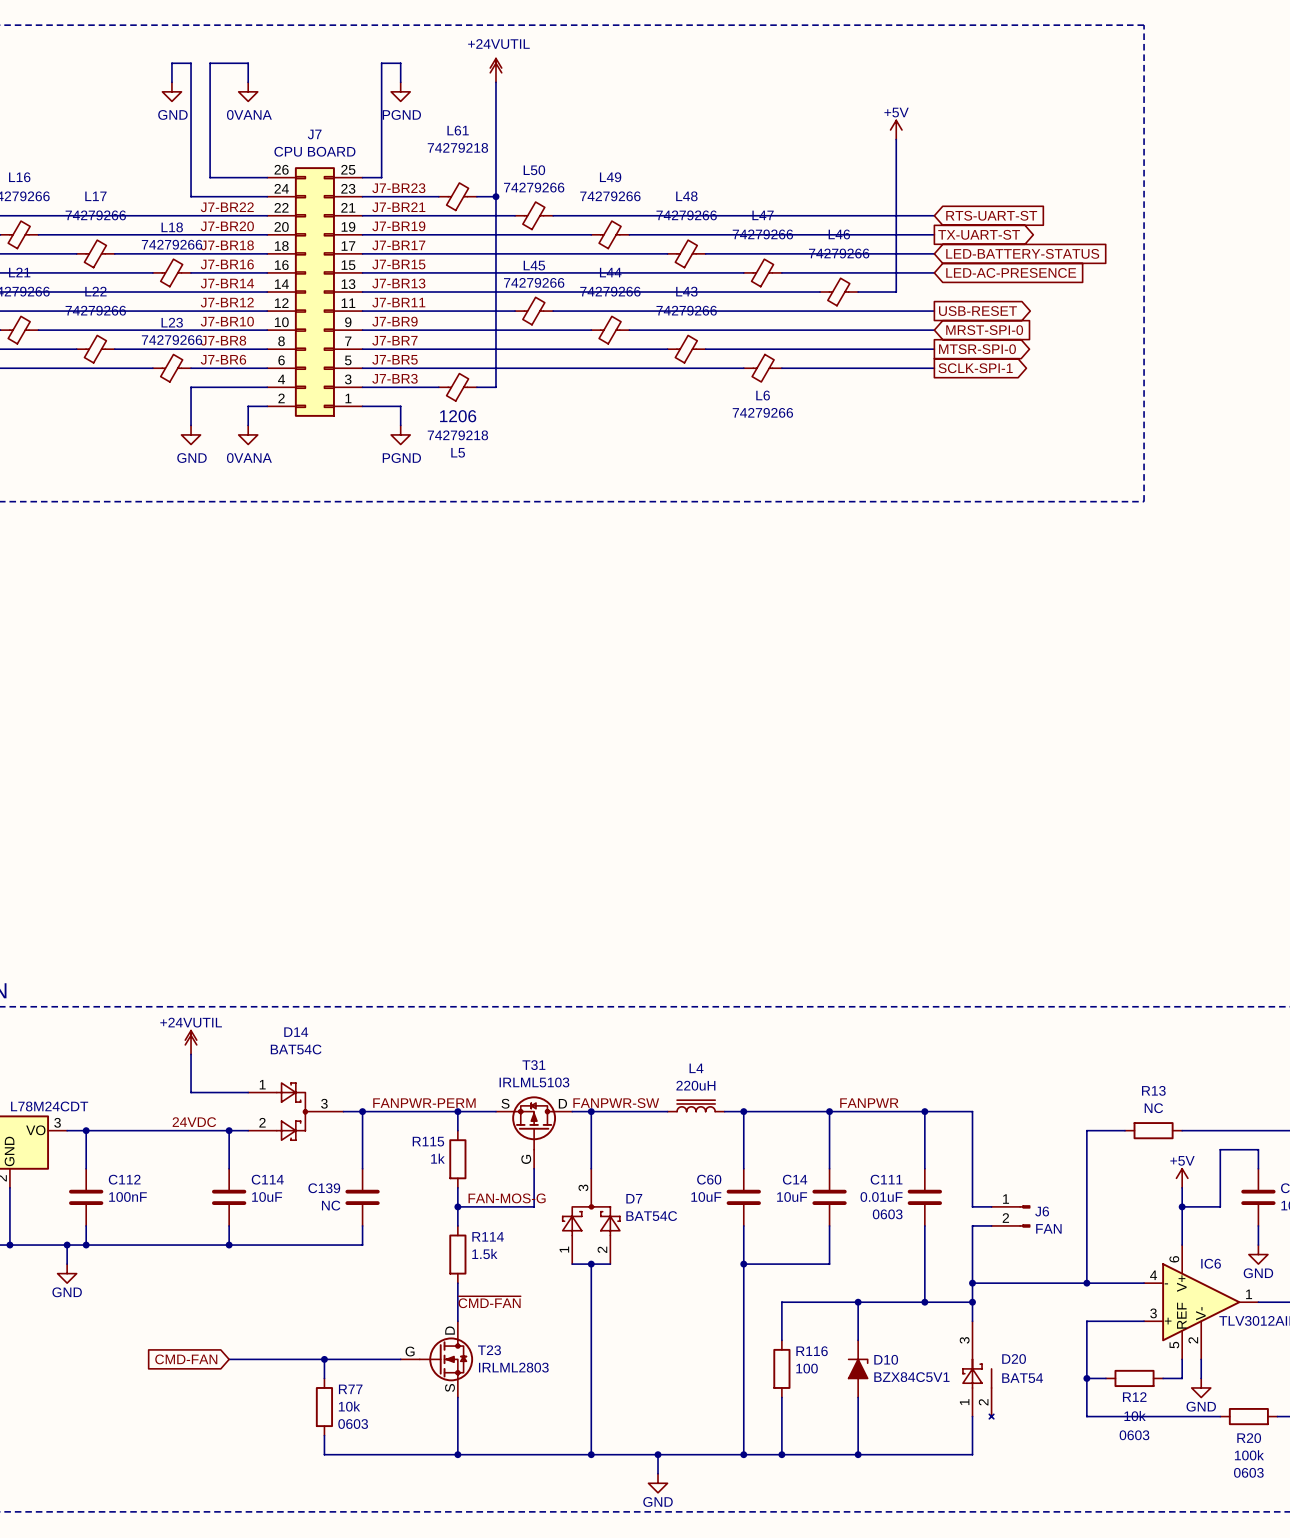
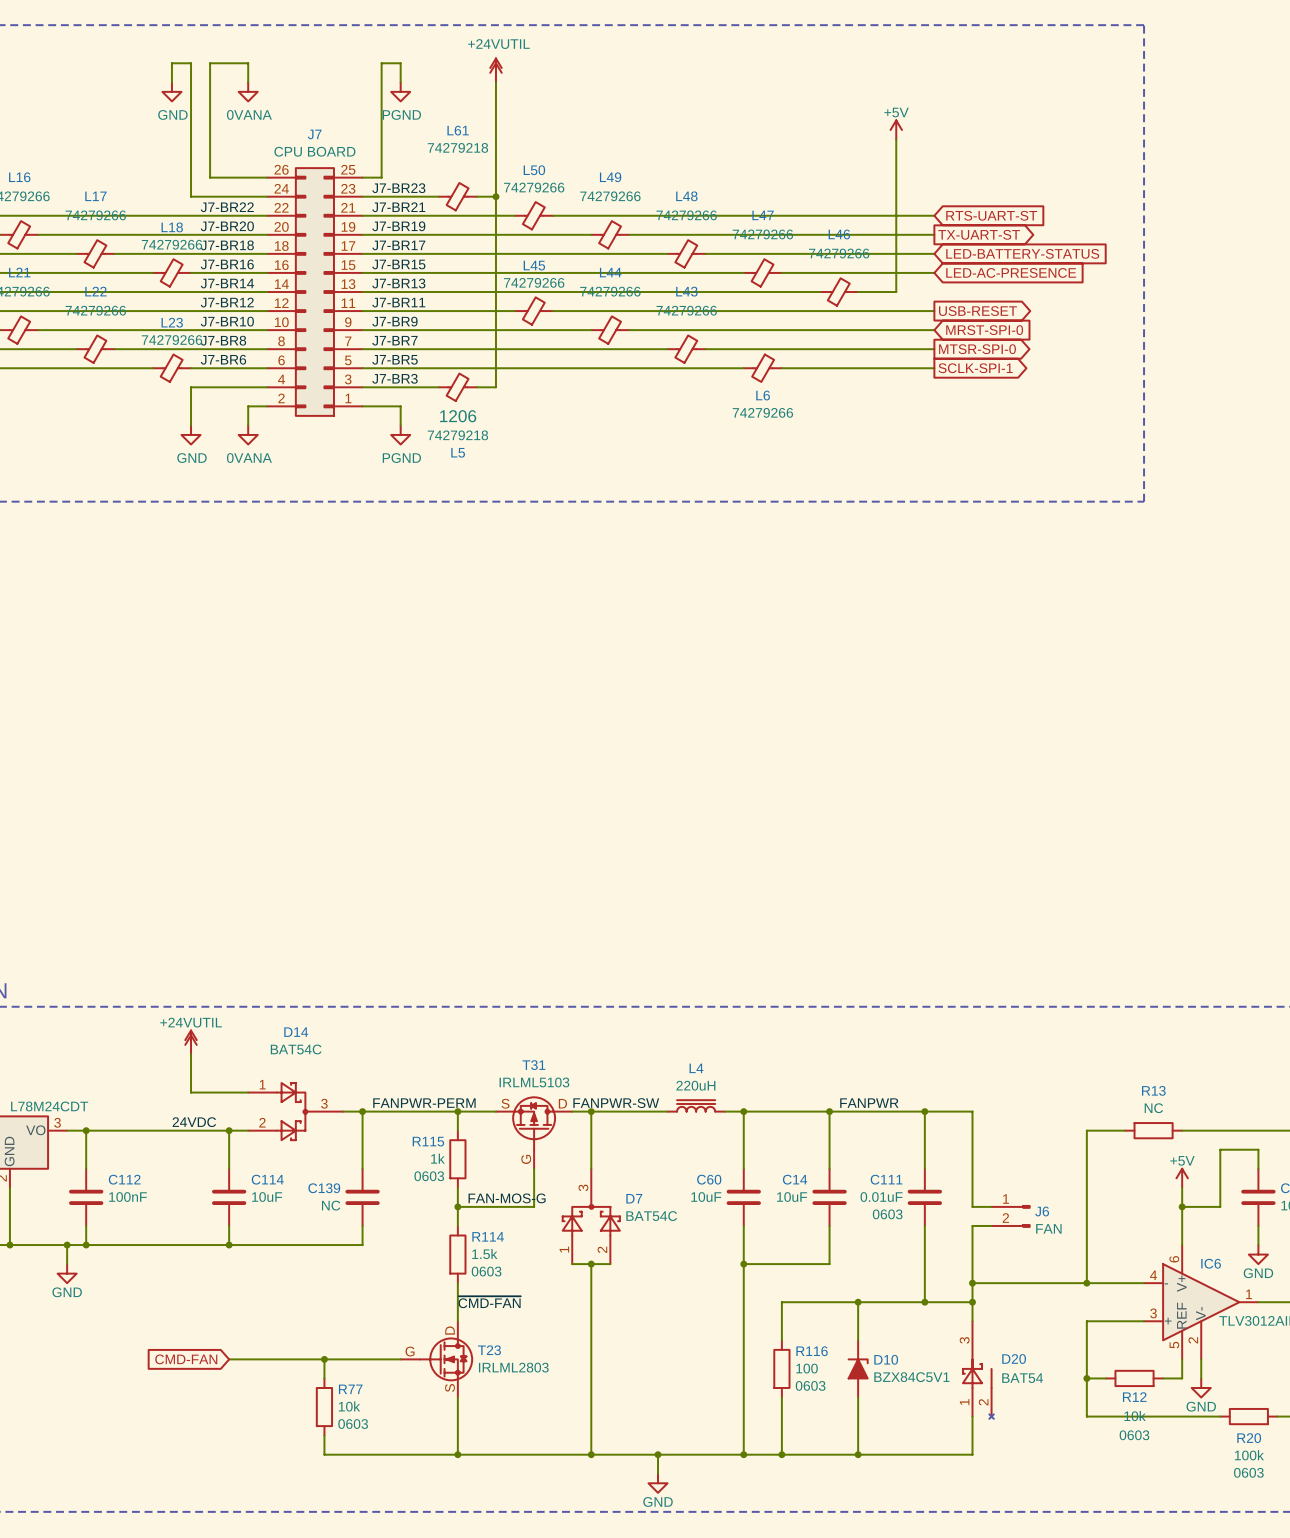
R115 text: none -> 0603 (429, 1176)
R114 text: none -> 0603 (486, 1271)
R116 text: none -> 0603 (810, 1385)

